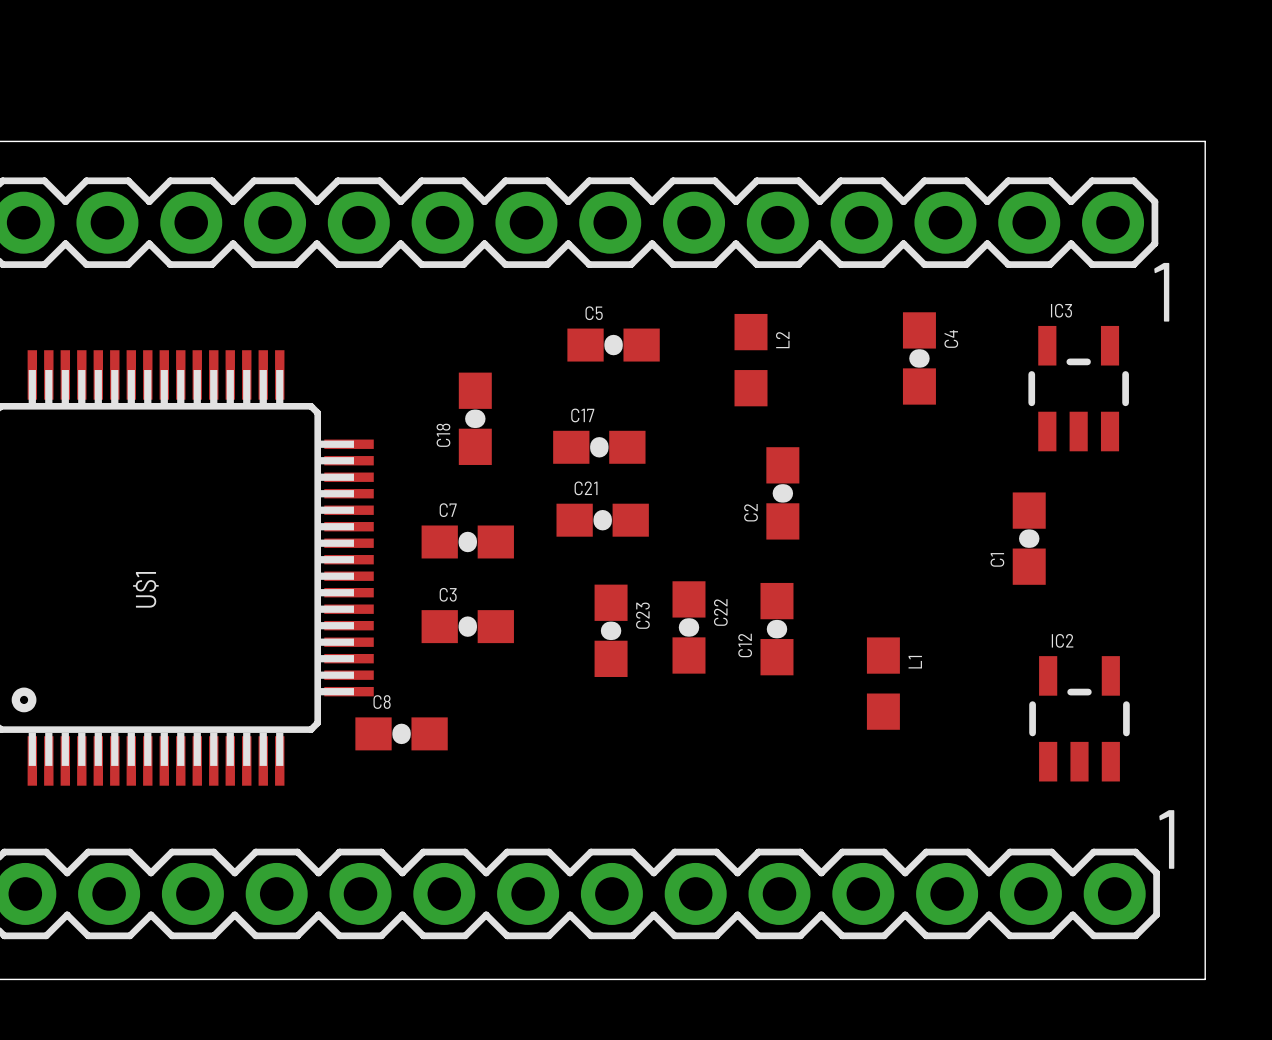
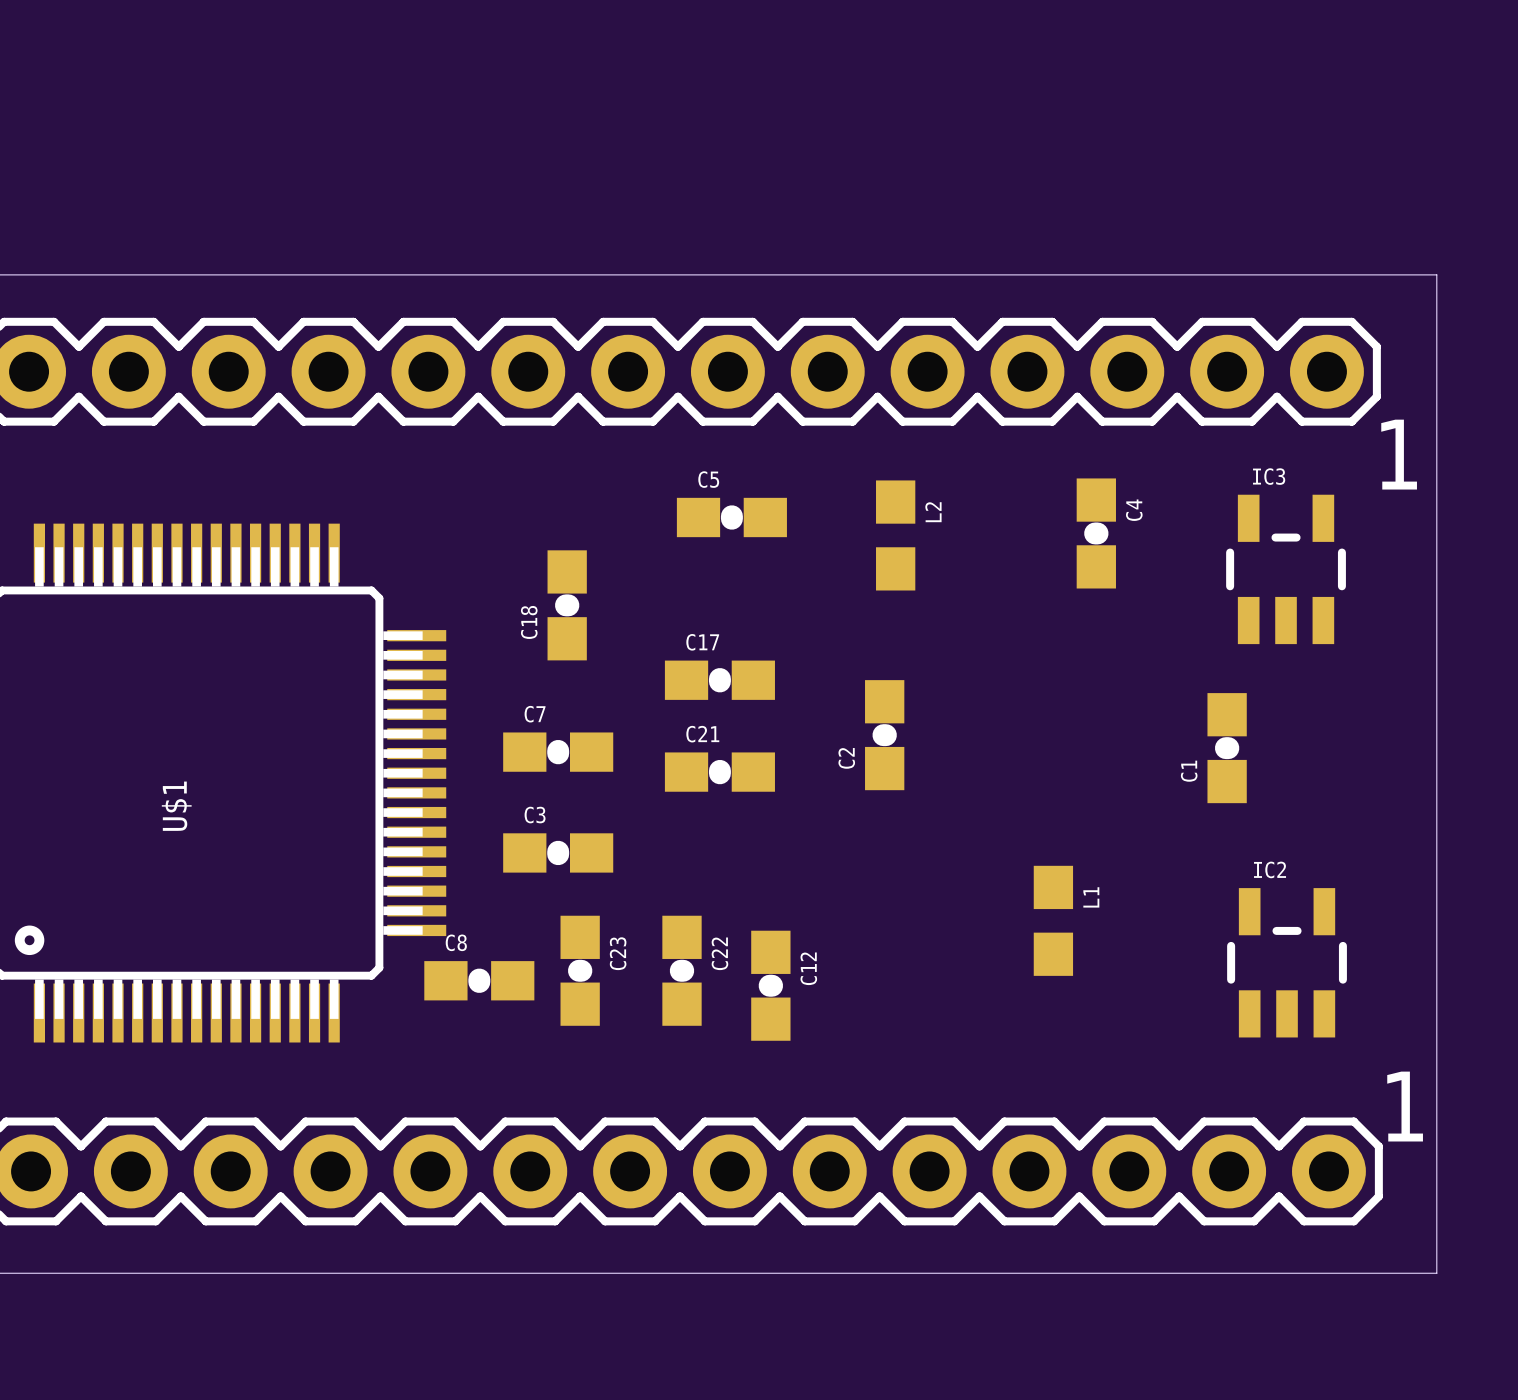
C17 position: (599, 447) -> (719, 680)
C2 position: (782, 493) -> (884, 735)
C21 position: (602, 520) -> (719, 772)
C22 position: (689, 627) -> (682, 970)
C12 position: (776, 629) -> (770, 985)
C23 position: (611, 630) -> (580, 970)
C12 name position: C12 (745, 645) -> C12 (808, 968)

